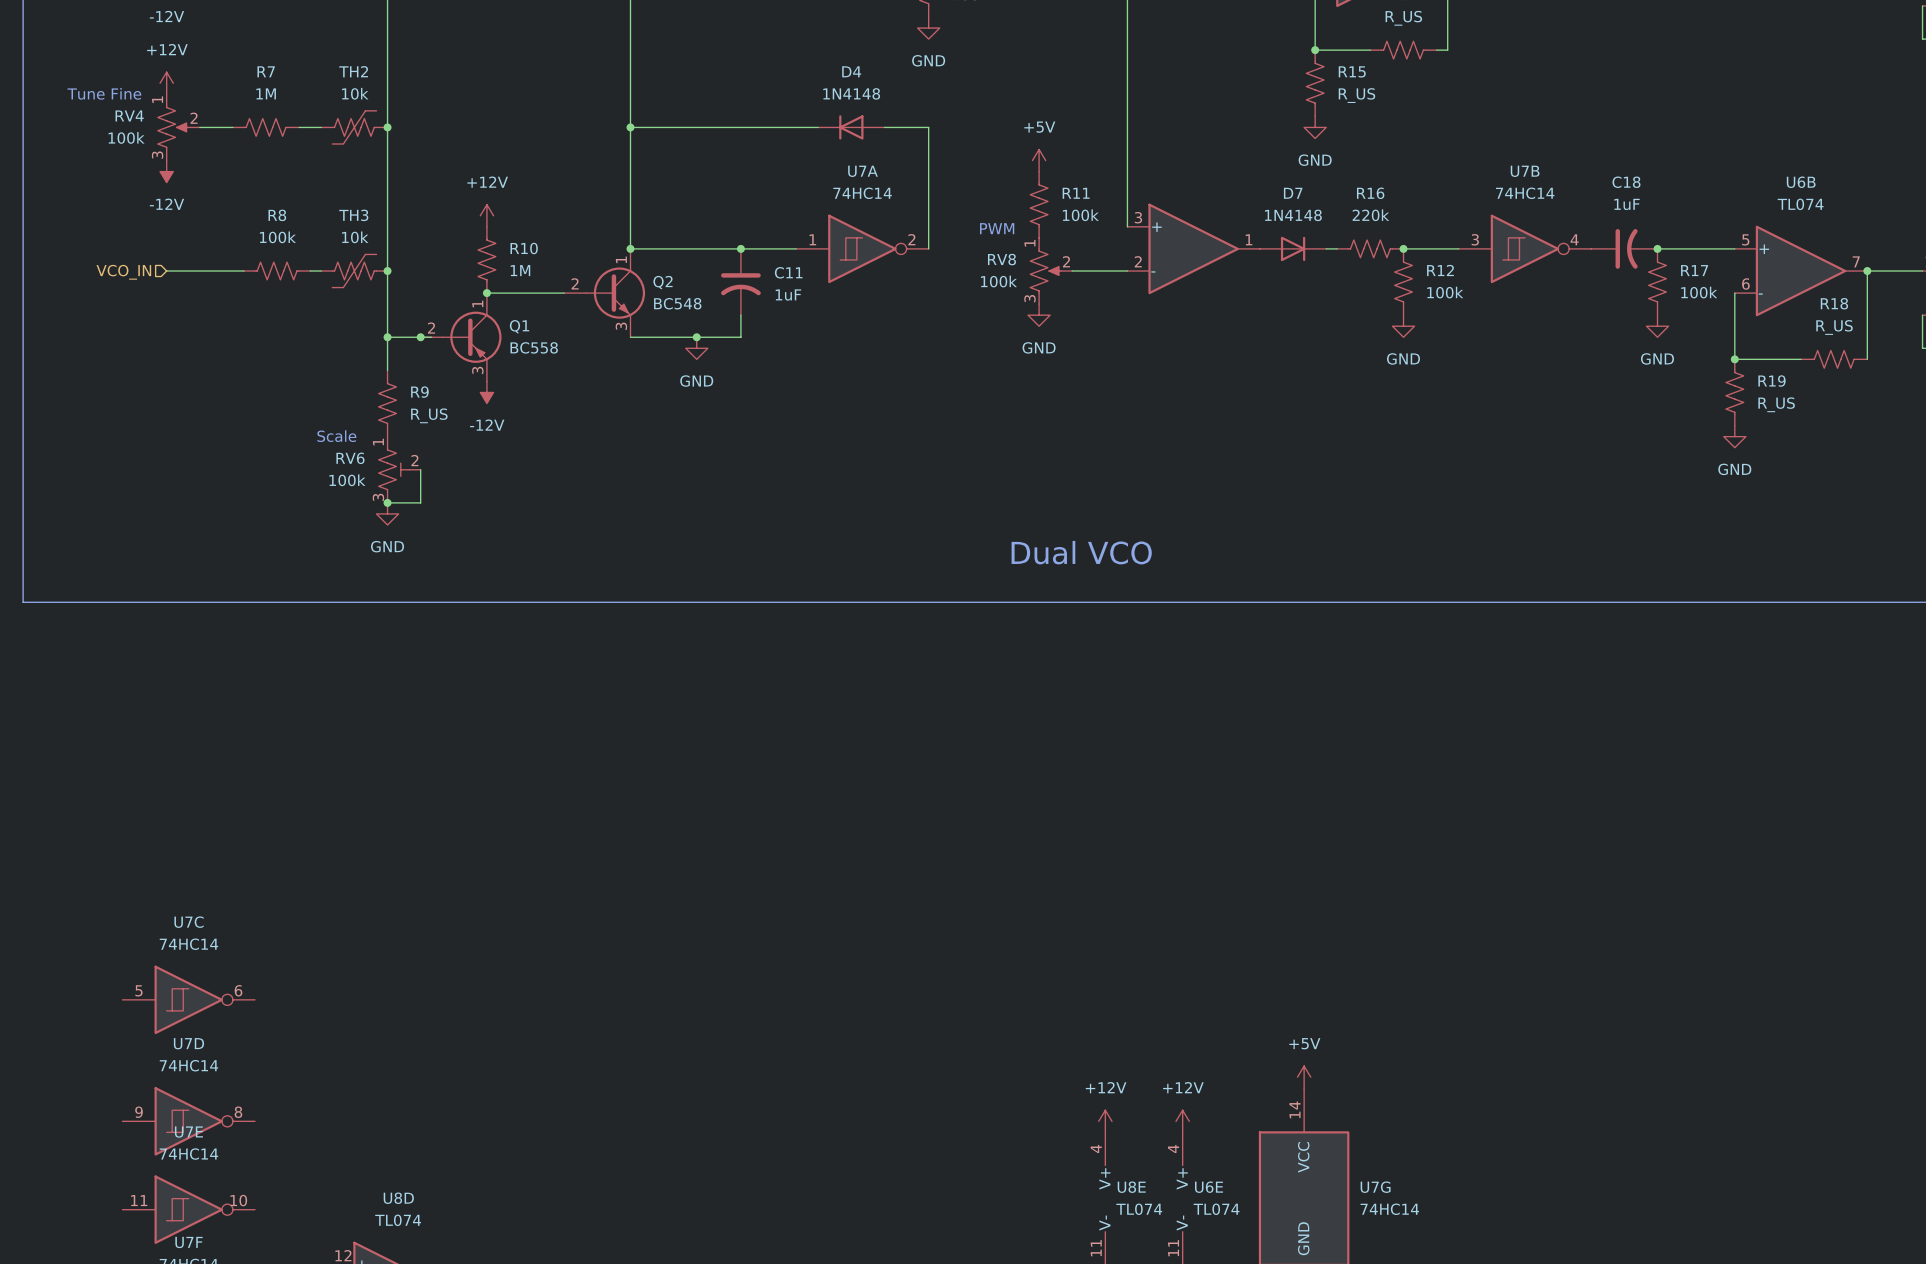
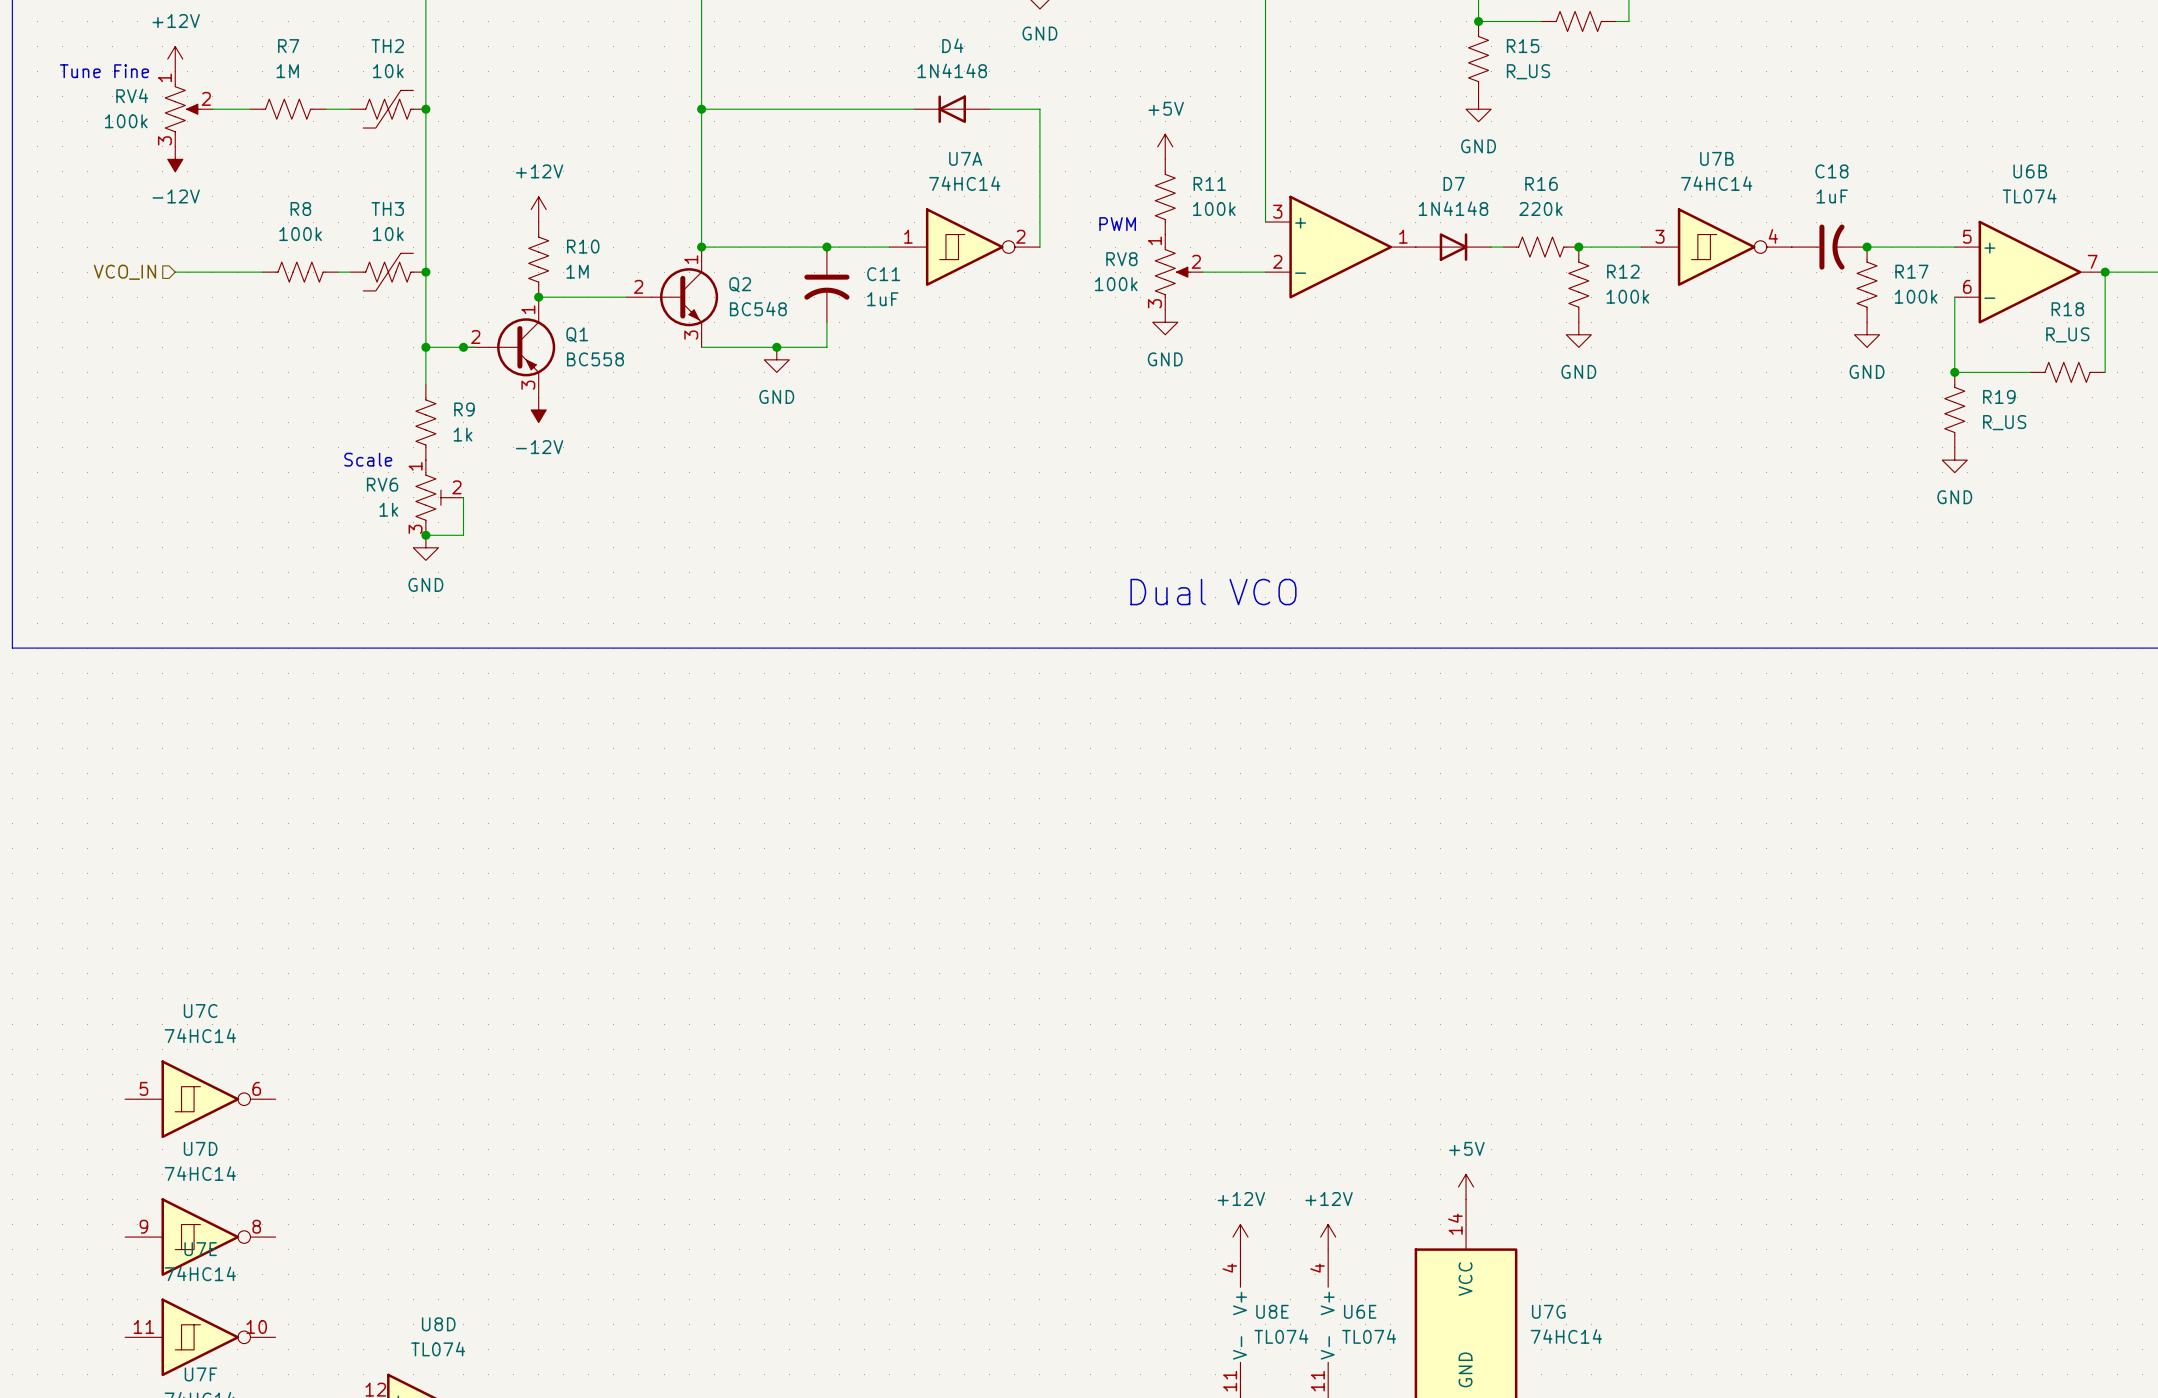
R9 value: R_US (429, 415) -> 1k (462, 434)
RV6 value: 100k (347, 480) -> 1k (388, 509)

